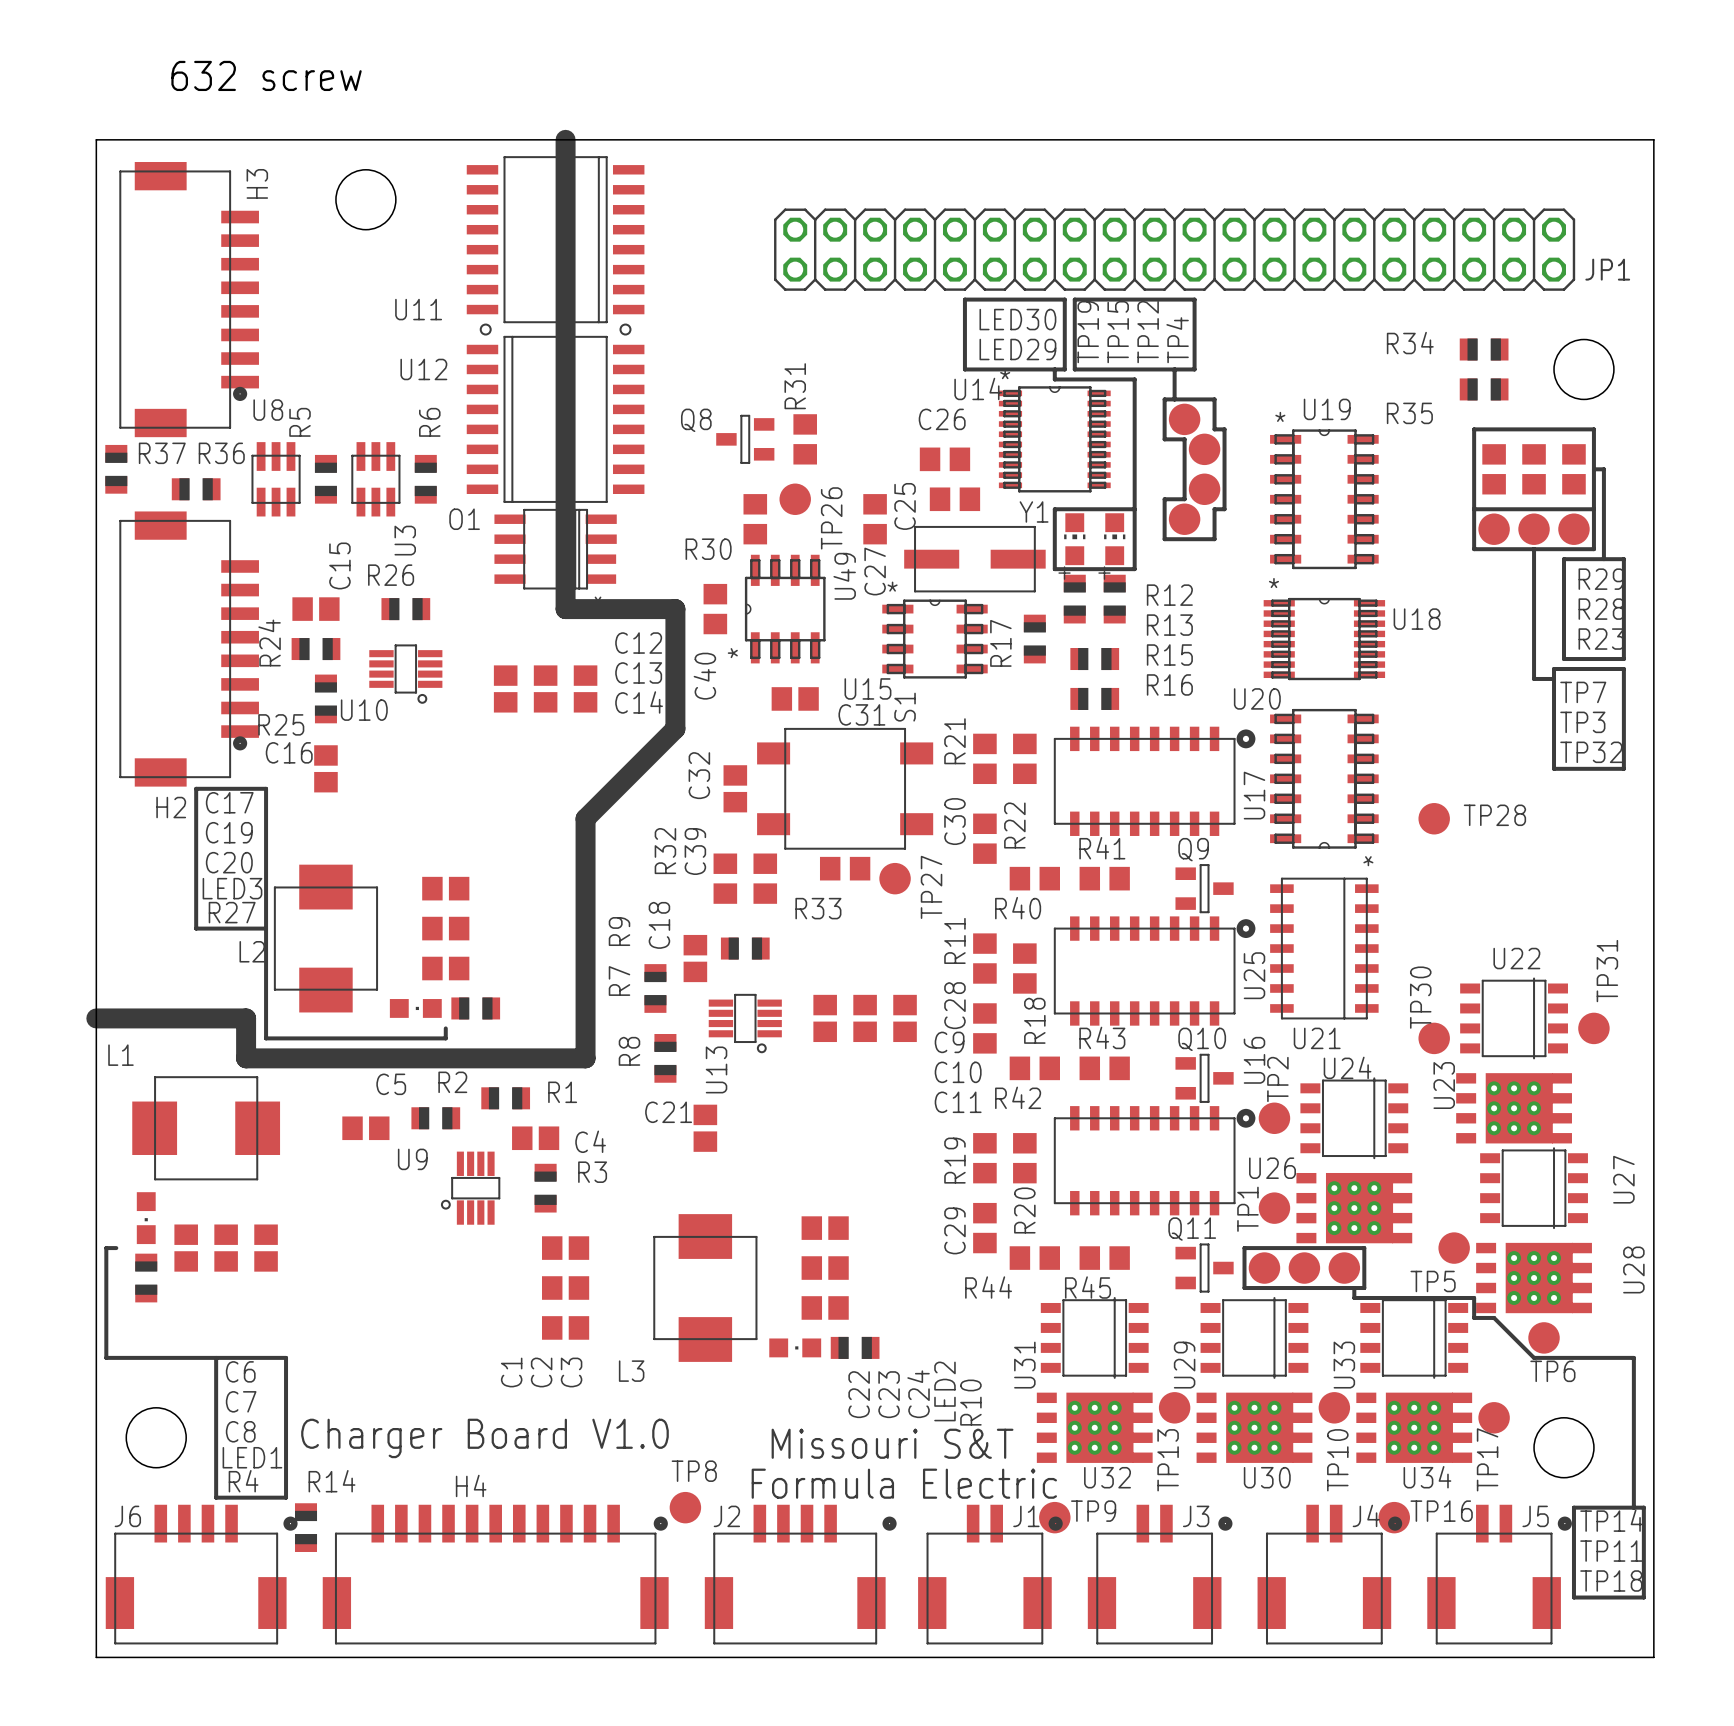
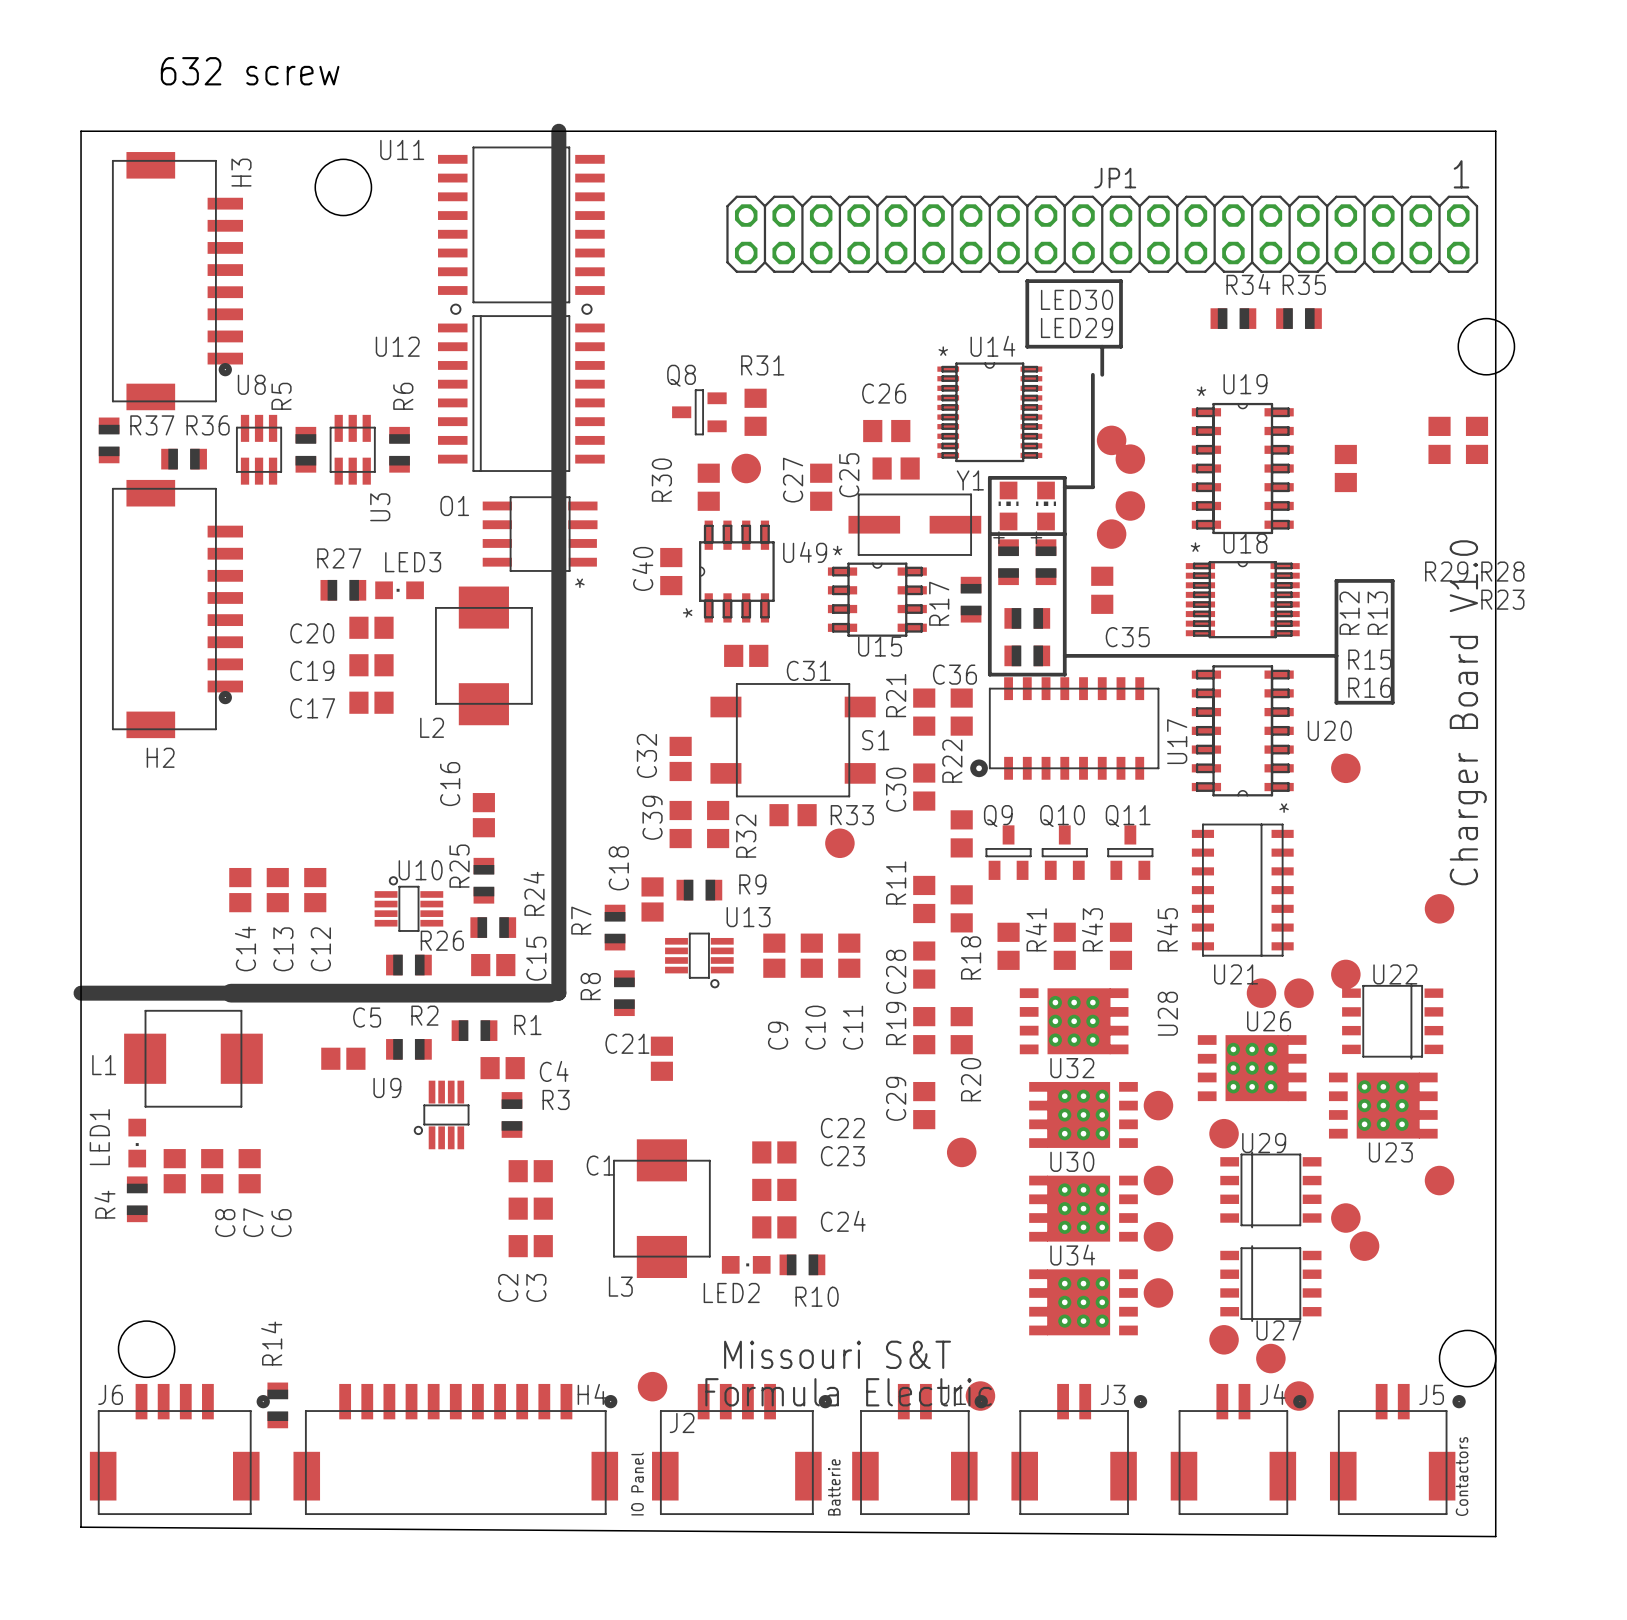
board edge: (96, 139) (96, 1657) (1653, 1657) (1653, 139) (1593, 139) -> (90, 131) (81, 131) (81, 1527) (1495, 1536) (1495, 131)
line: (565, 139) (565, 609) (675, 609) (675, 728) (585, 818) (585, 1058) -> (558, 131) (558, 993) (549, 993)
text: none -> 1 (1461, 174)
JP1 name position: JP1 (1607, 269) -> JP1 (1115, 178)
line: (964, 299) (1064, 299) (1064, 369) (964, 369) (964, 299) -> none
line: (1094, 299) (1074, 299) (1074, 369) (1094, 369) -> (1027, 281) (1027, 346)
U11 name position: U11 (418, 309) -> U11 (402, 149)
LED30 name position: LED30 (1017, 319) -> LED30 (1077, 299)
TP12 name: TP12 (1148, 332) -> none
R34 name position: R34 (1410, 343) -> R34 (1248, 284)
LED29 name position: LED29 (1017, 349) -> LED29 (1077, 327)
R34 position: (1484, 349) -> (1233, 318)
line: (1054, 369) (1054, 379) (1134, 379) (1134, 509) -> none
R31 name rotation: 0° (795, 386) -> 90° clockwise (762, 365)
U14 name position: U14 (978, 388) -> U14 (992, 346)
R35 position: (1484, 389) -> (1298, 318)
line: (1164, 399) (1214, 399) (1214, 429) (1224, 429) (1224, 509) (1214, 509) (1214, 539) (1164, 539) (1164, 519) -> (1064, 487) (1092, 487)
R35 name position: R35 (1409, 413) -> R35 (1304, 284)
TP19: (1184, 419) -> none
Q8 name position: Q8 (696, 420) -> Q8 (681, 375)
line: (1474, 429) (1474, 549) (1593, 549) (1593, 429) (1474, 429) -> none
line: (1164, 439) (1184, 439) (1184, 499) (1164, 499) -> (1092, 412) (1092, 468)
TP15: (1204, 449) -> none
part: none -> (1111, 440)
R29 position: (1494, 469) -> (1345, 468)
line: (1593, 469) (1603, 469) (1603, 559) -> none
line: (1474, 509) (1593, 509) -> none
TP26 name: TP26 (831, 518) -> none
TP4: (1184, 519) -> none
TP7: (1494, 529) -> none
TP3: (1534, 529) -> none
TP32: (1573, 529) -> none
part: none -> (1130, 505)
O1 position: (555, 549) -> (540, 534)
R30 name rotation: 0° (708, 549) -> 90° counterclockwise (661, 480)
line: (1534, 549) (1534, 678) (1554, 678) -> none
line: (1563, 559) (1623, 559) (1623, 659) (1563, 659) (1563, 559) -> none
C15 name position: C15 (339, 565) -> C15 (536, 958)
line: none -> (989, 534) (989, 674) (1064, 674) (1064, 534)
part: none -> (1111, 534)
C27 name position: C27 (875, 571) -> C27 (793, 480)
R26 name position: R26 (391, 575) -> R26 (442, 940)
U49 name rotation: 0° (844, 576) -> 90° clockwise (805, 552)
R12 name rotation: 0° (1169, 595) -> 90° counterclockwise (1349, 613)
R12 name position: R12 (1169, 595) -> R12 (1349, 613)
C15 position: (315, 609) -> (493, 965)
R26 position: (405, 609) -> (408, 965)
U18 name position: U18 (1417, 619) -> U18 (1245, 543)
line: none -> (1336, 580) (1392, 580) (1392, 702) (1336, 702) (1336, 580)
R13 name rotation: 0° (1169, 625) -> 90° counterclockwise (1377, 613)
R13 name position: R13 (1169, 625) -> R13 (1377, 613)
C35: none -> (1102, 590)
R24 name position: R24 (269, 642) -> R24 (534, 893)
C12 name rotation: 0° (638, 643) -> 90° counterclockwise (320, 949)
C12 name position: C12 (638, 643) -> C12 (320, 949)
R24 position: (315, 649) -> (493, 927)
R15 name position: R15 (1169, 655) -> R15 (1369, 659)
line: (1554, 668) (1623, 668) (1623, 768) (1554, 768) (1554, 668) -> none
C13 name rotation: 0° (638, 672) -> 90° counterclockwise (283, 949)
C13 name position: C13 (638, 672) -> C13 (283, 949)
U10 rotation: 0° (405, 674) -> 180° (408, 904)
U10 position: (405, 674) -> (408, 904)
C40 name position: C40 (704, 676) -> C40 (642, 568)
R16 name position: R16 (1169, 684) -> R16 (1369, 687)
C12 position: (505, 688) -> (315, 890)
C13 position: (545, 688) -> (277, 890)
C14 position: (585, 688) -> (240, 890)
U15 name position: U15 (867, 688) -> U15 (880, 646)
R25 position: (325, 698) -> (483, 880)
line: none -> (1064, 655) (1336, 655)
U20 name position: U20 (1257, 698) -> U20 (1329, 730)
C14 name rotation: 0° (639, 702) -> 90° counterclockwise (245, 948)
C14 name position: C14 (639, 702) -> C14 (245, 948)
S1 name rotation: 0° (905, 707) -> 90° clockwise (875, 740)
S1 name position: S1 (905, 707) -> S1 (875, 740)
R25 name rotation: 0° (281, 724) -> 90° counterclockwise (459, 866)
C16 name rotation: 0° (289, 752) -> 90° counterclockwise (450, 784)
text: none -> Charger Board V1.0 (1468, 712)
C16 position: (325, 768) -> (483, 815)
C32 name position: C32 (699, 775) -> C32 (646, 755)
U17 rotation: 0° (1154, 781) -> 180° (1064, 728)
C32 position: (735, 788) -> (680, 758)
C17 name position: C17 (229, 802) -> C17 (312, 708)
TP28 name: TP28 (1494, 815) -> none
C30 name position: C30 (954, 821) -> C30 (896, 789)
R22 name: R22 (1014, 825) -> C36 (954, 674)
C19 name position: C19 (229, 832) -> C19 (312, 670)
R32 name position: R32 (665, 851) -> R32 (746, 836)
C39 name position: C39 (695, 851) -> C39 (652, 817)
C20 name position: C20 (229, 862) -> C20 (312, 633)
TP27: (895, 878) -> none
R40: (1034, 878) -> none
R41 rotation: 0° (1104, 878) -> 90° clockwise (1008, 946)
R41 position: (1104, 878) -> (1008, 946)
LED3 name position: LED3 (232, 888) -> LED3 (413, 562)
C17 position: (445, 888) -> (371, 702)
R22: none -> (961, 833)
Q9 rotation: 0° (1204, 888) -> 90° counterclockwise (1008, 852)
Q9 position: (1204, 888) -> (1008, 852)
part: none -> (839, 843)
R33 name position: R33 (818, 908) -> R33 (852, 815)
R27 name position: R27 (232, 912) -> R27 (339, 558)
line: (266, 928) (196, 928) (196, 788) (266, 788) (266, 1038) (445, 1038) (445, 1028) -> none
C19 position: (445, 928) -> (371, 665)
R9 name rotation: 0° (619, 931) -> 90° clockwise (752, 884)
R9 name position: R9 (619, 931) -> R9 (752, 884)
L2 position: (325, 938) -> (483, 655)
L2 name position: L2 (252, 951) -> L2 (432, 727)
U22 name position: U22 (1516, 958) -> U22 (1395, 974)
C20 position: (445, 968) -> (371, 627)
part: none -> (1439, 908)
U25: (1154, 971) -> none
TP30 name: TP30 (1420, 997) -> none
C28 name position: C28 (954, 1005) -> C28 (896, 971)
LED3 rotation: 0° (415, 1008) -> 180° (399, 590)
LED3 position: (415, 1008) -> (399, 590)
R27 position: (475, 1008) -> (343, 590)
line: (96, 1018) (246, 1018) (246, 1058) -> (81, 993) (230, 993)
U22 position: (1514, 1018) -> (1392, 1021)
TP31: (1593, 1028) -> none
C9 name rotation: 0° (949, 1042) -> 90° counterclockwise (778, 1035)
C9 name position: C9 (949, 1042) -> C9 (778, 1035)
L1 name position: L1 (120, 1055) -> L1 (104, 1065)
part: none -> (1261, 993)
part: none -> (1298, 993)
R42: (1034, 1068) -> none
R43 rotation: 0° (1104, 1068) -> 90° clockwise (1064, 946)
R43 position: (1104, 1068) -> (1064, 946)
U13 name rotation: 0° (716, 1069) -> 90° clockwise (748, 917)
U13 name position: U13 (716, 1069) -> U13 (748, 917)
C10 name rotation: 0° (958, 1072) -> 90° counterclockwise (815, 1027)
C10 name position: C10 (958, 1072) -> C10 (815, 1027)
Q10 rotation: 0° (1204, 1078) -> 90° counterclockwise (1064, 852)
Q10 position: (1204, 1078) -> (1064, 852)
U23 name rotation: 0° (1444, 1085) -> 90° clockwise (1390, 1152)
U23 name position: U23 (1444, 1085) -> U23 (1390, 1152)
C11 name rotation: 0° (958, 1102) -> 90° counterclockwise (853, 1027)
U23 position: (1514, 1108) -> (1383, 1105)
TP2: (1274, 1118) -> none
U24: (1354, 1118) -> none
R19 position: (984, 1158) -> (924, 1030)
R20 position: (1024, 1158) -> (961, 1030)
R19 name position: R19 (954, 1160) -> R19 (896, 1023)
U16: (1154, 1160) -> none
U26 name position: U26 (1272, 1168) -> U26 (1269, 1021)
part: none -> (1158, 1105)
U27 name position: U27 (1623, 1179) -> U27 (1278, 1330)
U27 rotation: 0° (1534, 1188) -> 180° (1270, 1283)
U27 position: (1534, 1188) -> (1270, 1283)
TP1: (1274, 1208) -> none
part: none -> (1224, 1133)
U26 position: (1354, 1208) -> (1252, 1068)
R20 name position: R20 (1024, 1210) -> R20 (971, 1079)
C29 position: (984, 1228) -> (924, 1105)
part: none -> (961, 1152)
C29 name position: C29 (954, 1230) -> C29 (896, 1098)
line: (116, 1248) (106, 1248) (106, 1357) (286, 1357) (286, 1497) (216, 1497) (216, 1357) -> none
line: (1244, 1248) (1364, 1248) (1364, 1288) (1244, 1288) (1244, 1248) -> none
TP5: (1454, 1248) -> none
R44: (1034, 1258) -> none
R45 rotation: 0° (1104, 1258) -> 90° clockwise (1120, 946)
R45 position: (1104, 1258) -> (1120, 946)
part: none -> (1158, 1180)
part: none -> (1439, 1180)
Q11 rotation: 0° (1204, 1268) -> 90° counterclockwise (1130, 852)
Q11 position: (1204, 1268) -> (1130, 852)
TP14: (1264, 1268) -> none
TP11: (1304, 1268) -> none
TP18: (1344, 1268) -> none
U28 position: (1534, 1278) -> (1074, 1021)
R45 name position: R45 (1087, 1287) -> R45 (1167, 929)
line: (1354, 1288) (1354, 1297) (1474, 1297) (1474, 1317) (1494, 1317) (1534, 1357) (1633, 1357) (1633, 1507) -> none
part: none -> (1345, 1218)
part: none -> (1158, 1236)
part: none -> (1364, 1246)
U31: (1094, 1337) -> none
U29 rotation: 0° (1254, 1337) -> 180° (1270, 1189)
U29 position: (1254, 1337) -> (1270, 1189)
U33: (1414, 1337) -> none
TP6: (1544, 1337) -> none
U29 name position: U29 (1184, 1365) -> U29 (1264, 1143)
C6 name rotation: 0° (240, 1371) -> 90° counterclockwise (281, 1223)
C6 name position: C6 (240, 1371) -> C6 (281, 1223)
L3 name position: L3 (631, 1371) -> L3 (620, 1286)
C1 name rotation: 0° (511, 1372) -> 90° clockwise (600, 1165)
C1 name position: C1 (511, 1372) -> C1 (600, 1165)
part: none -> (1158, 1292)
LED2 name rotation: 0° (944, 1391) -> 90° clockwise (731, 1292)
LED2 name position: LED2 (944, 1391) -> LED2 (731, 1292)
C22 name rotation: 0° (859, 1394) -> 90° clockwise (842, 1128)
C22 name position: C22 (859, 1394) -> C22 (842, 1128)
C23 name rotation: 0° (889, 1394) -> 90° clockwise (842, 1156)
C23 name position: C23 (889, 1394) -> C23 (842, 1156)
C24 name rotation: 0° (918, 1394) -> 90° clockwise (843, 1221)
C24 name position: C24 (918, 1394) -> C24 (843, 1221)
C7 name rotation: 0° (241, 1401) -> 90° counterclockwise (253, 1222)
C7 name position: C7 (241, 1401) -> C7 (253, 1222)
R10 name rotation: 0° (970, 1402) -> 90° clockwise (817, 1296)
R10 name position: R10 (970, 1402) -> R10 (817, 1296)
TP13: (1174, 1407) -> none
TP10: (1334, 1407) -> none
TP17: (1494, 1417) -> none
U32 rotation: 0° (1094, 1427) -> 180° (1083, 1114)
U32 position: (1094, 1427) -> (1083, 1114)
U30 rotation: 0° (1254, 1427) -> 180° (1083, 1208)
U30 position: (1254, 1427) -> (1083, 1208)
part: none -> (1224, 1339)
U34 rotation: 0° (1414, 1427) -> 180° (1083, 1302)
U34 position: (1414, 1427) -> (1083, 1302)
C8 name rotation: 0° (240, 1431) -> 90° counterclockwise (225, 1223)
C8 name position: C8 (240, 1431) -> C8 (225, 1223)
text: Charger Board V1.0 (484, 1438) -> none
part: none -> (1270, 1358)
LED1 name rotation: 0° (252, 1457) -> 90° counterclockwise (99, 1137)
LED1 name position: LED1 (252, 1457) -> LED1 (99, 1137)
part: none -> (652, 1386)
R4 name rotation: 0° (243, 1481) -> 90° counterclockwise (104, 1204)
R4 name position: R4 (243, 1481) -> R4 (104, 1204)
R14 name rotation: 0° (332, 1481) -> 90° counterclockwise (271, 1343)
H4 name position: H4 (471, 1485) -> H4 (592, 1394)
part: none -> (980, 1396)
part: none -> (1298, 1396)
TP8: (685, 1507) -> none
line: (1573, 1507) (1643, 1507) (1643, 1597) (1573, 1597) (1573, 1507) -> none
TP9: (1054, 1517) -> none
TP16: (1394, 1517) -> none
R14 position: (306, 1527) -> (277, 1405)
text: none -> Contactors (1462, 1476)
J6 position: (201, 1574) -> (179, 1449)
H4 position: (495, 1574) -> (455, 1449)
J2 position: (800, 1574) -> (742, 1449)
J1 position: (990, 1574) -> (920, 1449)
J3 position: (1160, 1574) -> (1079, 1449)
J4 position: (1329, 1574) -> (1238, 1449)
J5 position: (1499, 1574) -> (1397, 1449)
text: none -> IO Panel (637, 1483)
text: none -> Batterie (834, 1487)

